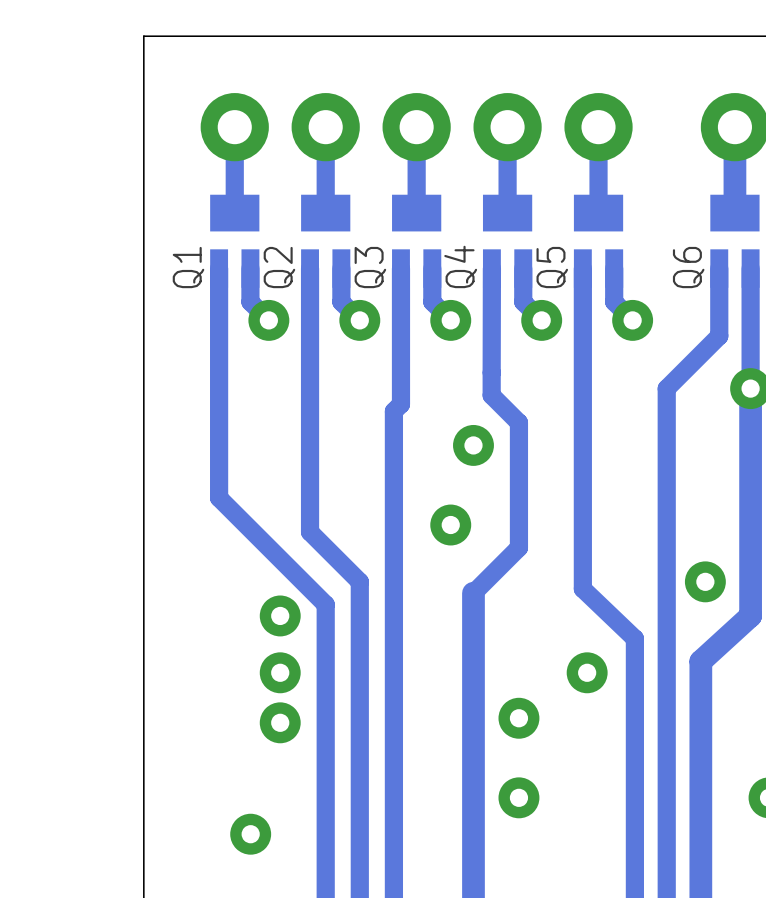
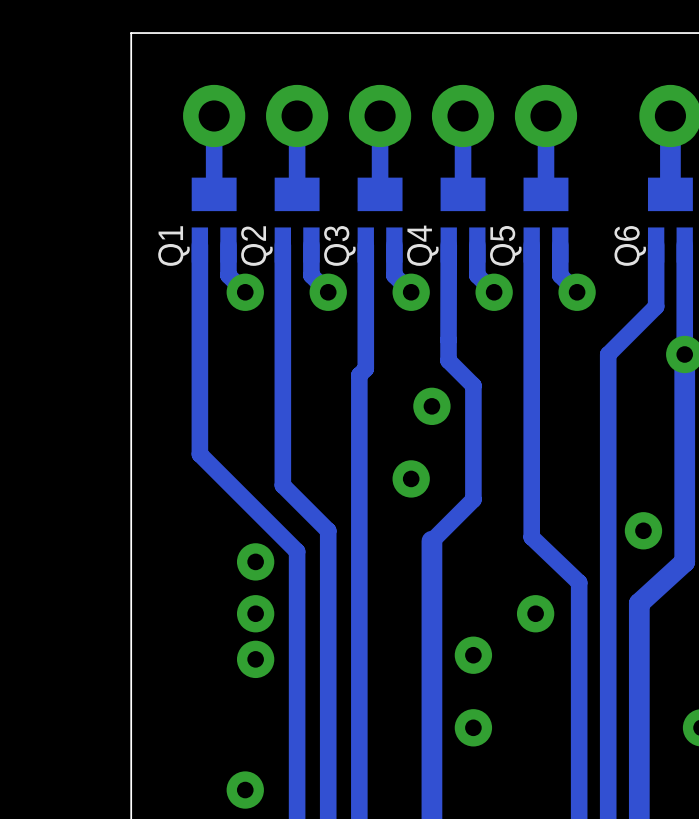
via position: (250, 834) -> (245, 790)

